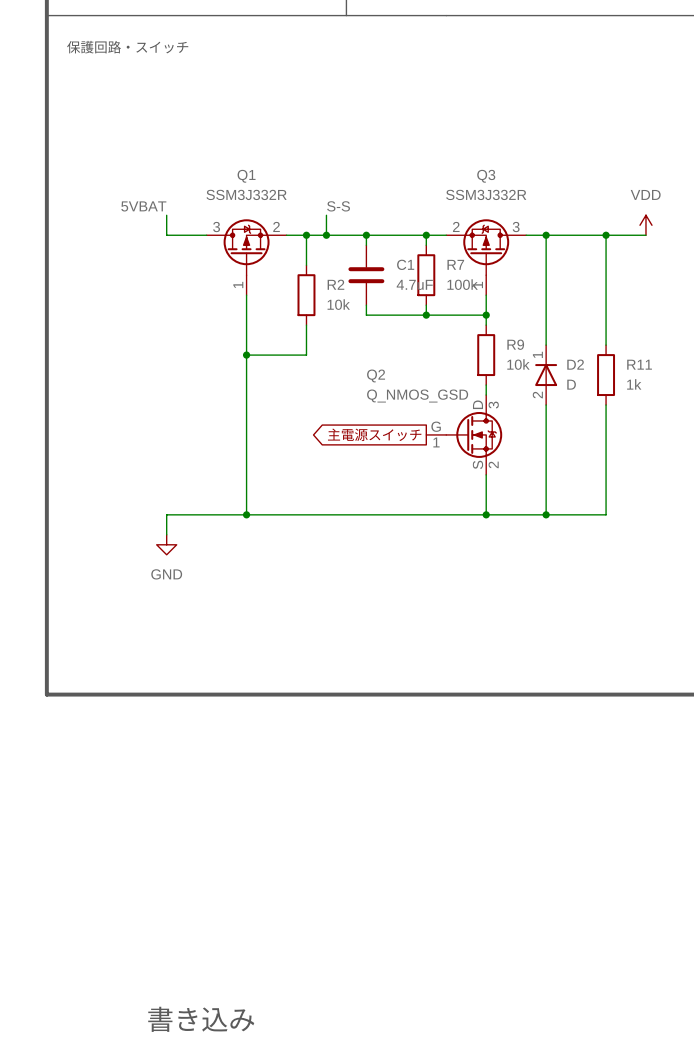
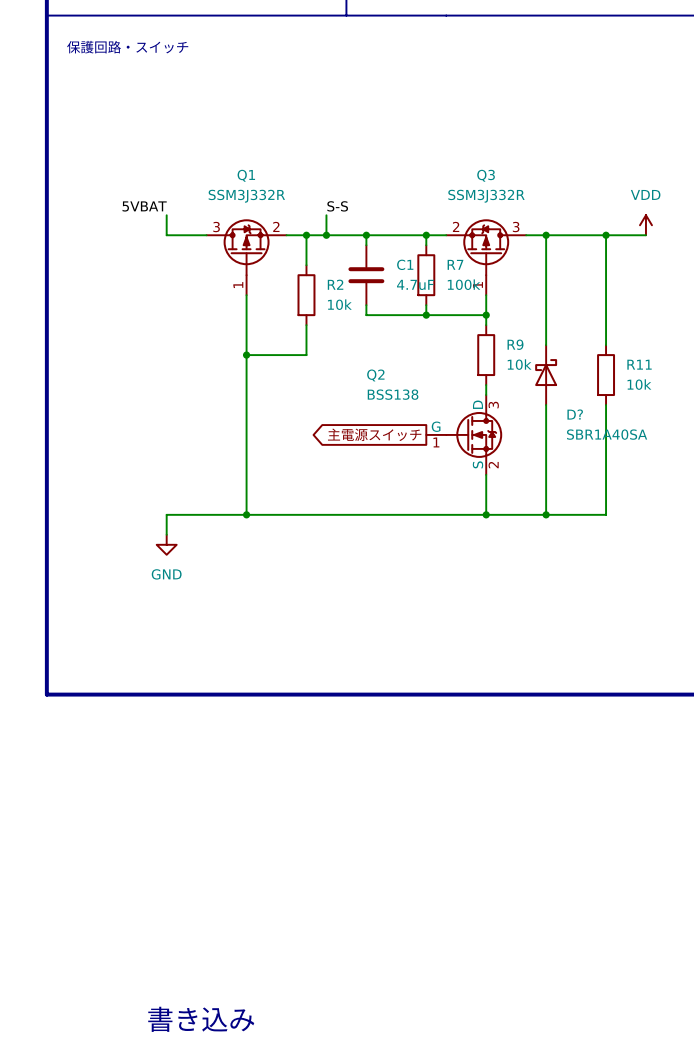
D2: D (546, 375) -> none
D?: none -> SBR1A40SA (546, 375)
R11 value: 1k (634, 384) -> 10k (639, 384)
Q2 value: Q_NMOS_GSD (417, 396) -> BSS138 (393, 394)

